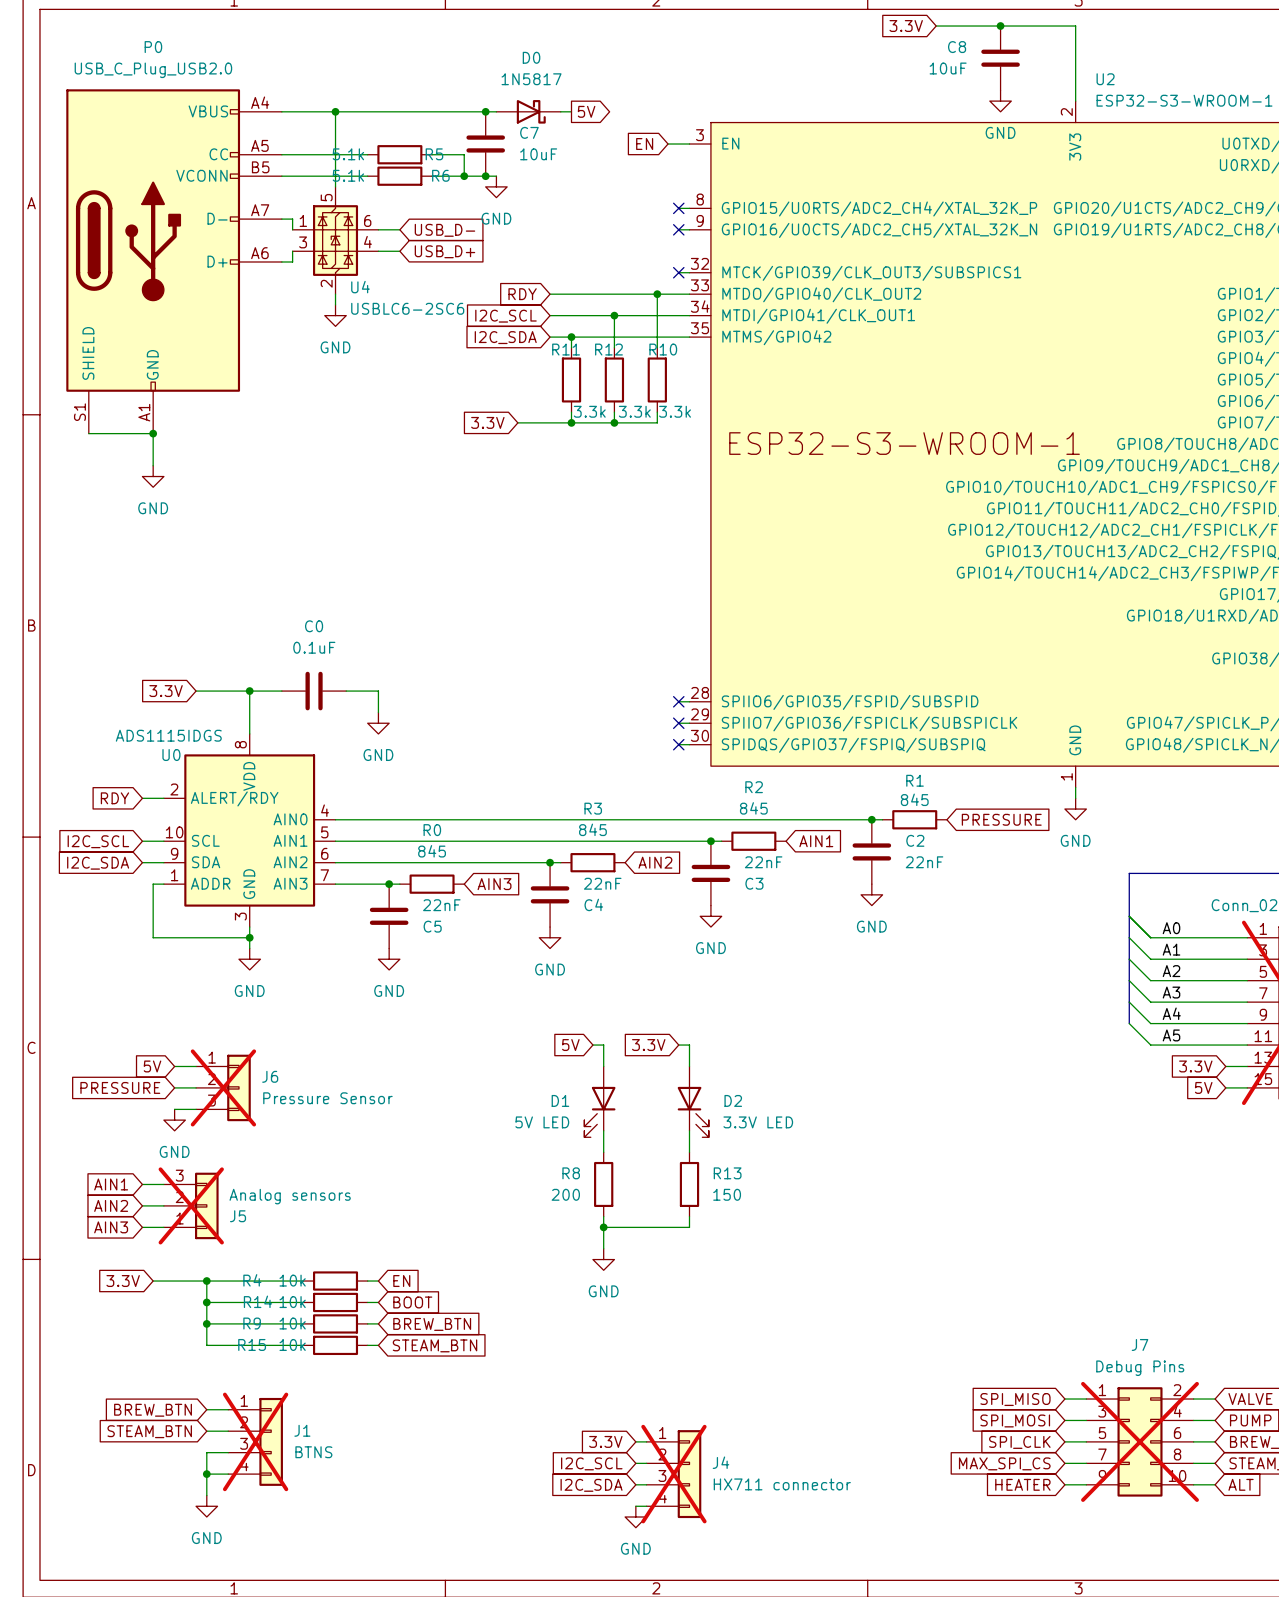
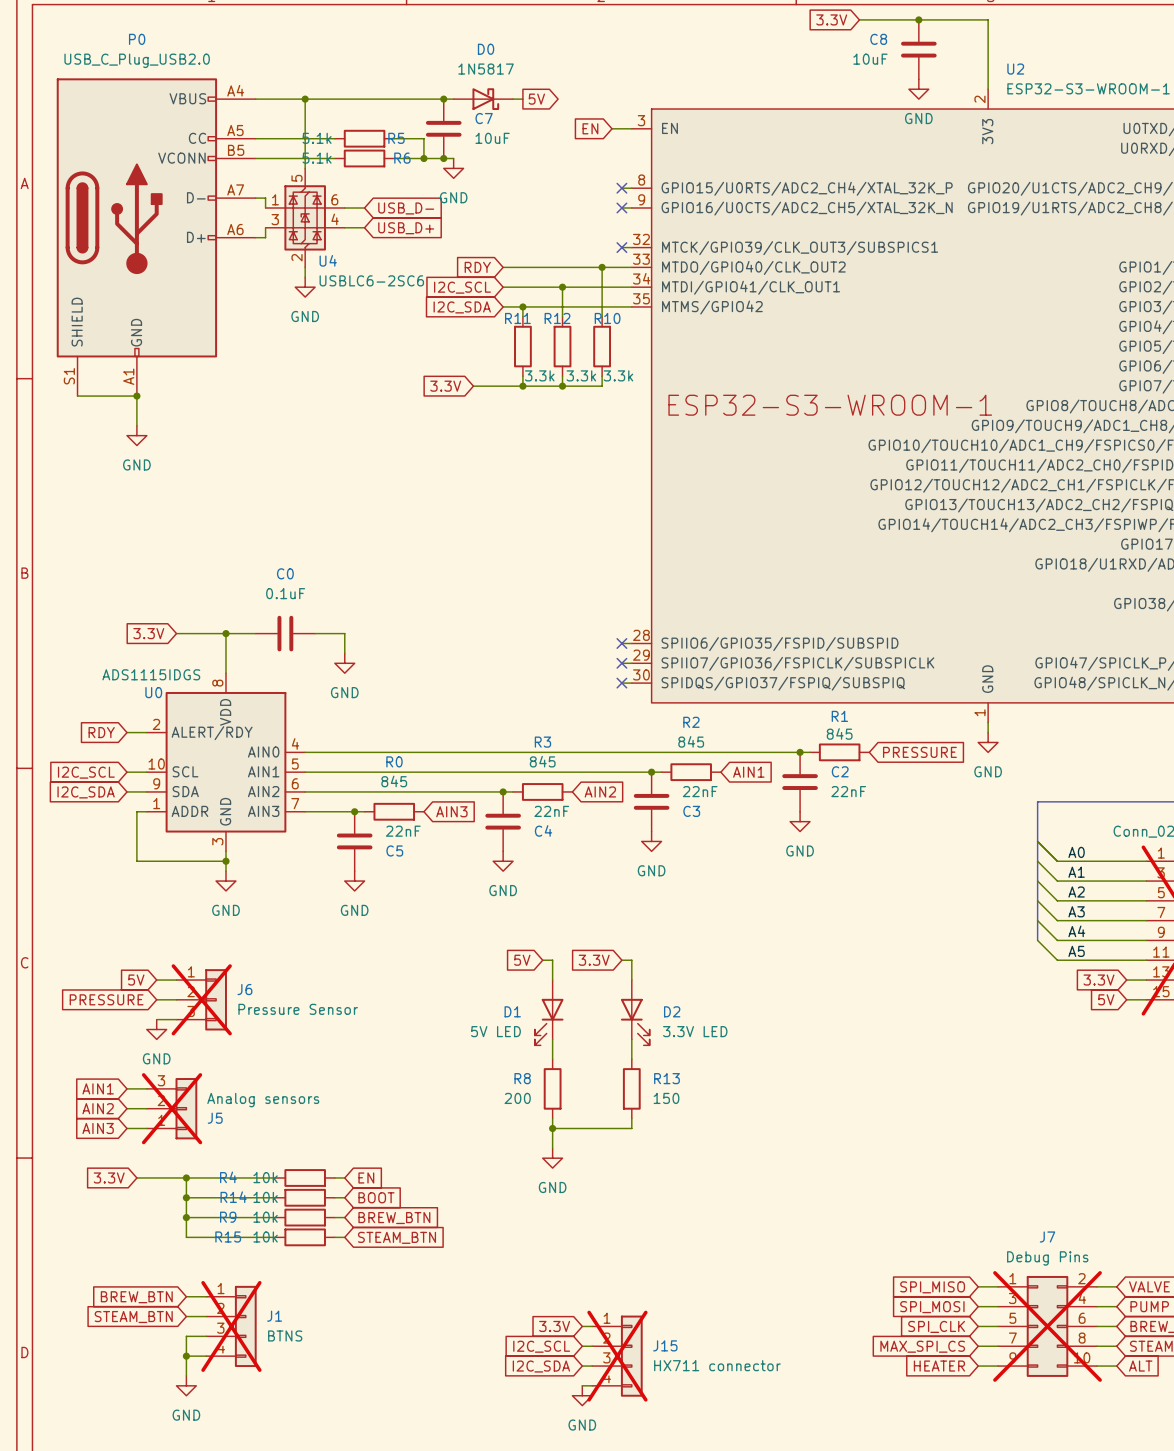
J4 name: J4 (720, 1462) -> J15 (665, 1345)

